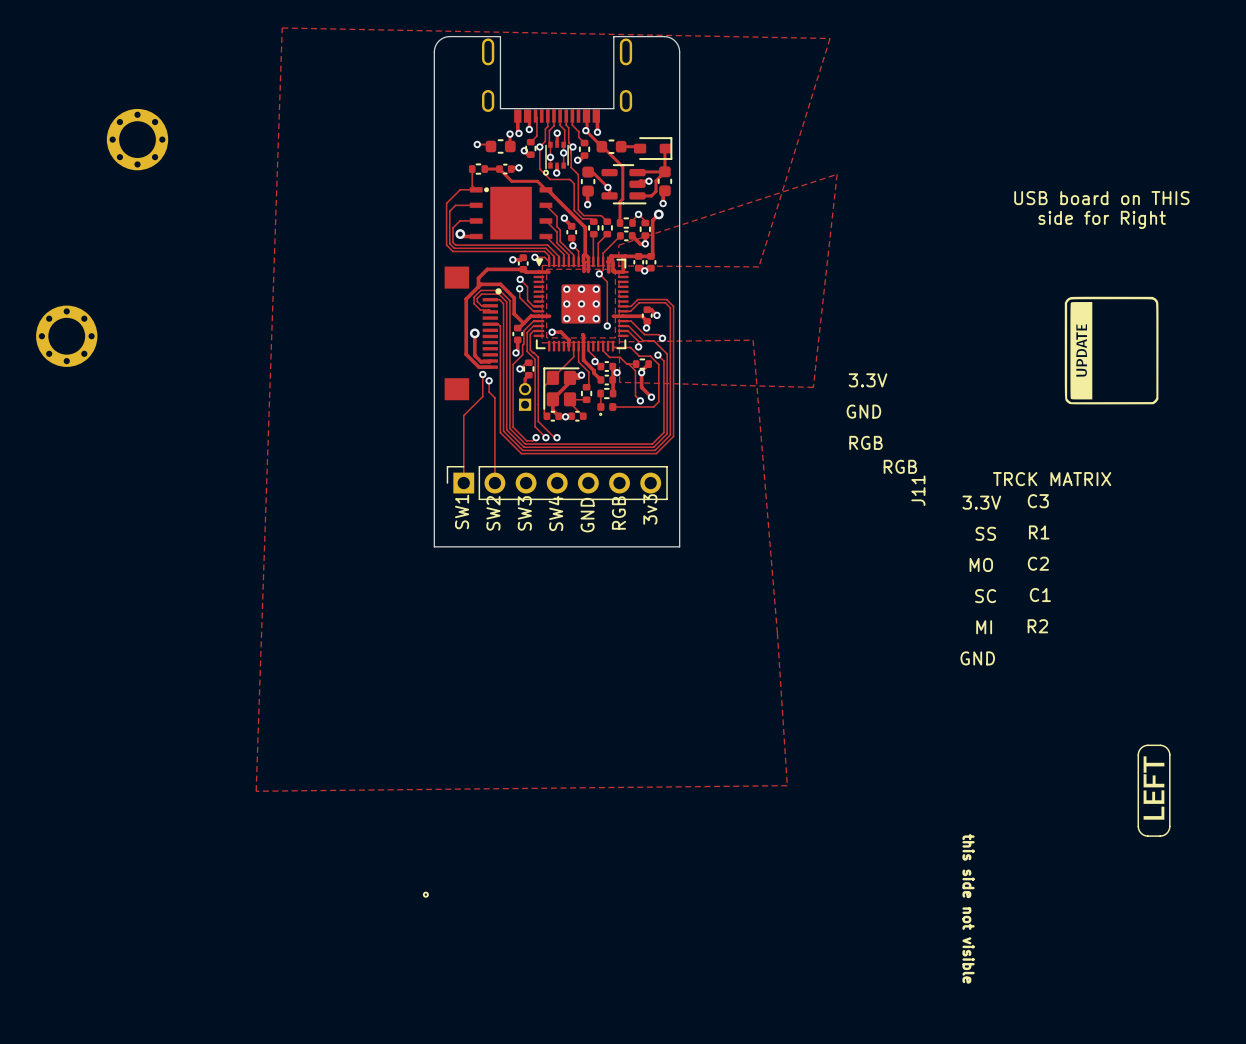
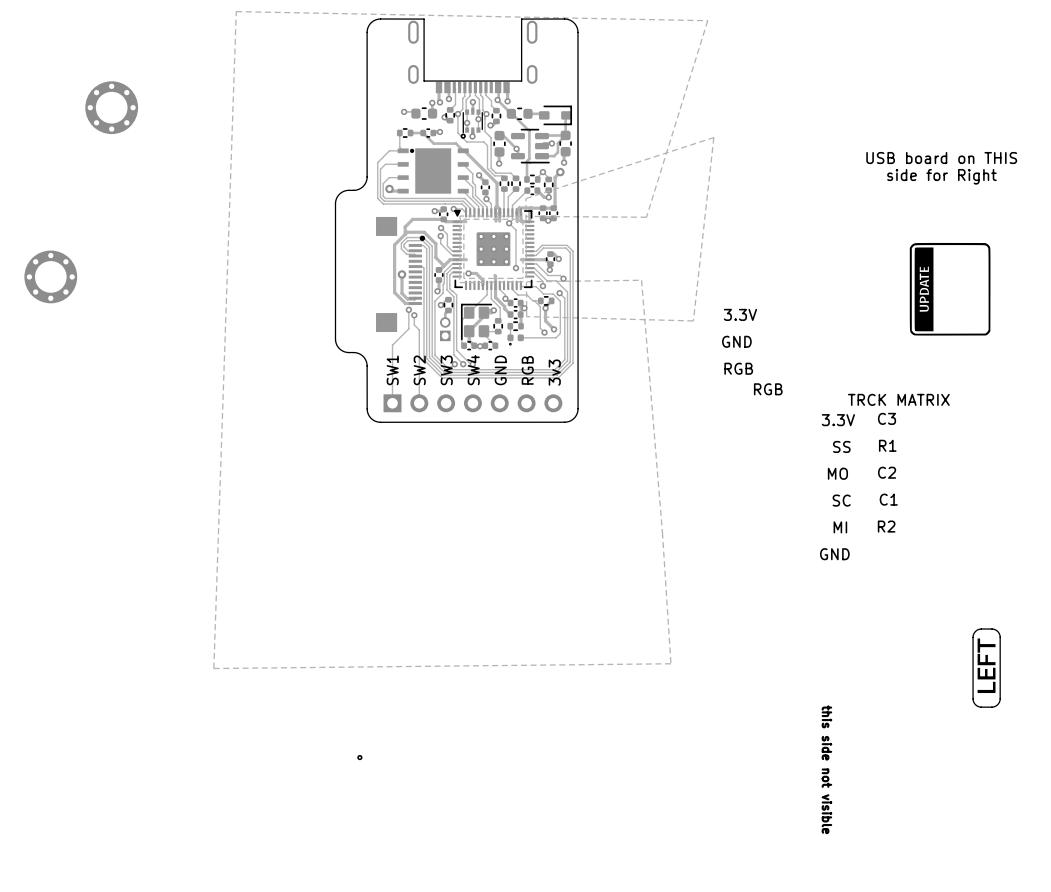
board edge: (449, 36) (438, 41) (434, 52) (434, 546) (679, 546) (679, 52) (675, 41) (663, 36) -> (380, 19) (371, 22) (367, 30) (366, 179) (359, 189) (340, 193) (335, 202) (335, 339) (337, 346) (341, 350) (358, 353) (365, 360) (367, 411) (372, 419) (380, 422) (564, 422) (571, 420) (576, 414) (577, 32) (574, 22) (564, 19)
J11: (557, 483) -> none
part: none -> (472, 403)
text position: 3v3 (650, 509) -> 3v3 (554, 372)
text position: SW1 (462, 511) -> SW1 (392, 370)
text position: SW2 (493, 513) -> SW2 (419, 370)
text position: SW3 (524, 513) -> SW3 (446, 370)
text position: SW4 (555, 513) -> SW4 (473, 370)
text position: RGB (618, 513) -> RGB (527, 370)
text position: GND (587, 515) -> GND (500, 370)

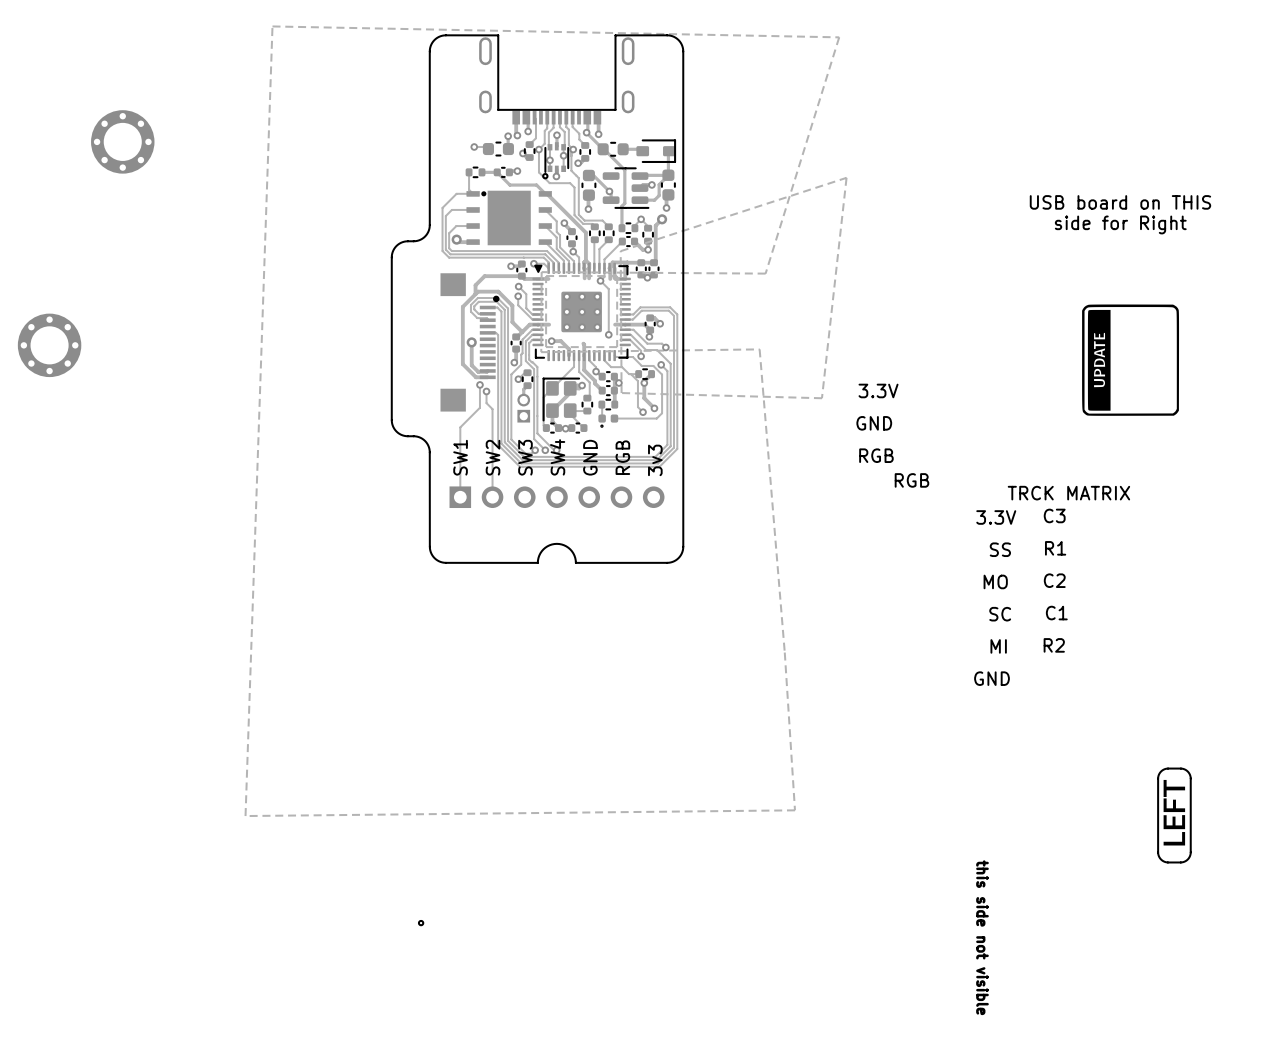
board edge: (577, 32) (578, 408) (575, 415) (570, 420) (564, 422) (377, 421) (371, 418) (367, 411) (367, 365) -> (683, 51) (683, 546) (680, 555) (675, 560) (668, 562) (575, 562) (570, 549) (556, 543) (543, 549) (537, 562) (440, 561) (433, 556) (429, 548) (429, 452)

